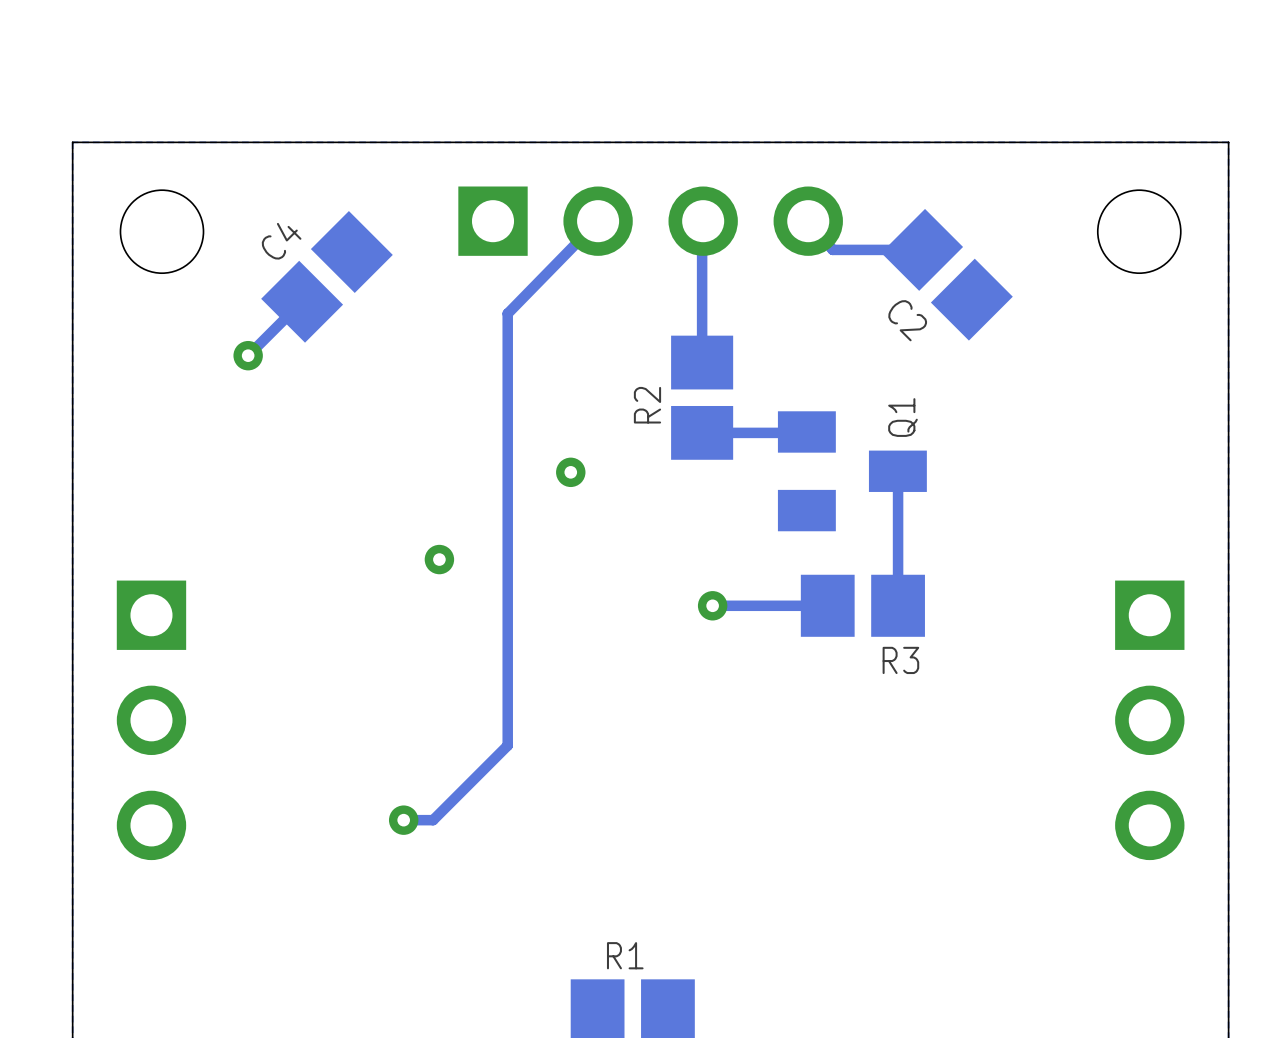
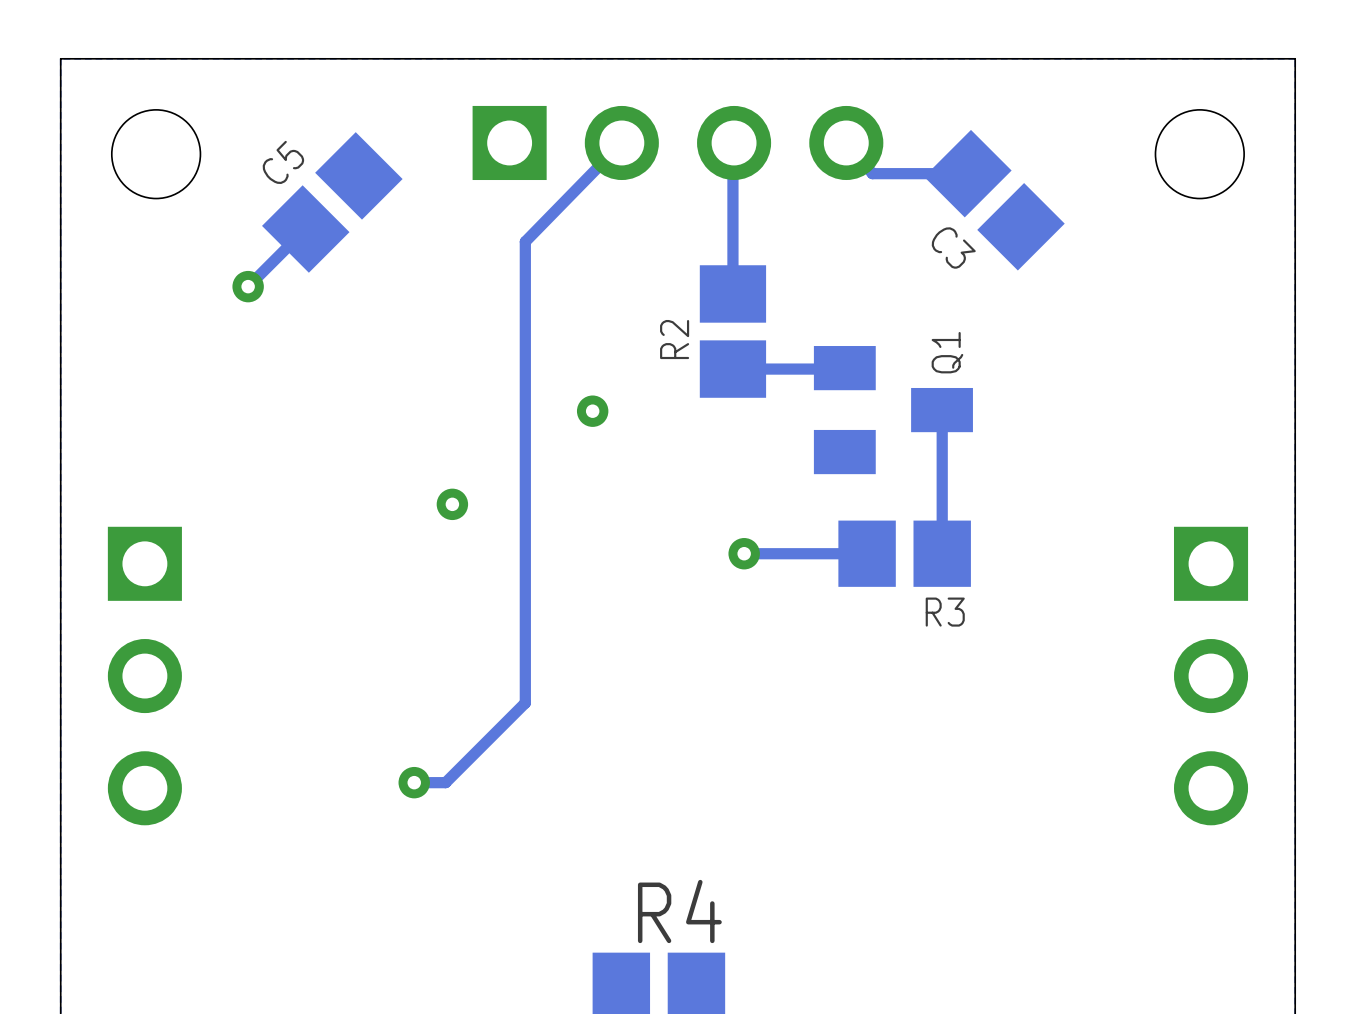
C4 name: C4 (281, 241) -> C5 (283, 162)
C2 name: C2 (907, 320) -> C3 (953, 248)
R1 name: R1 (625, 955) -> R4 (679, 911)

